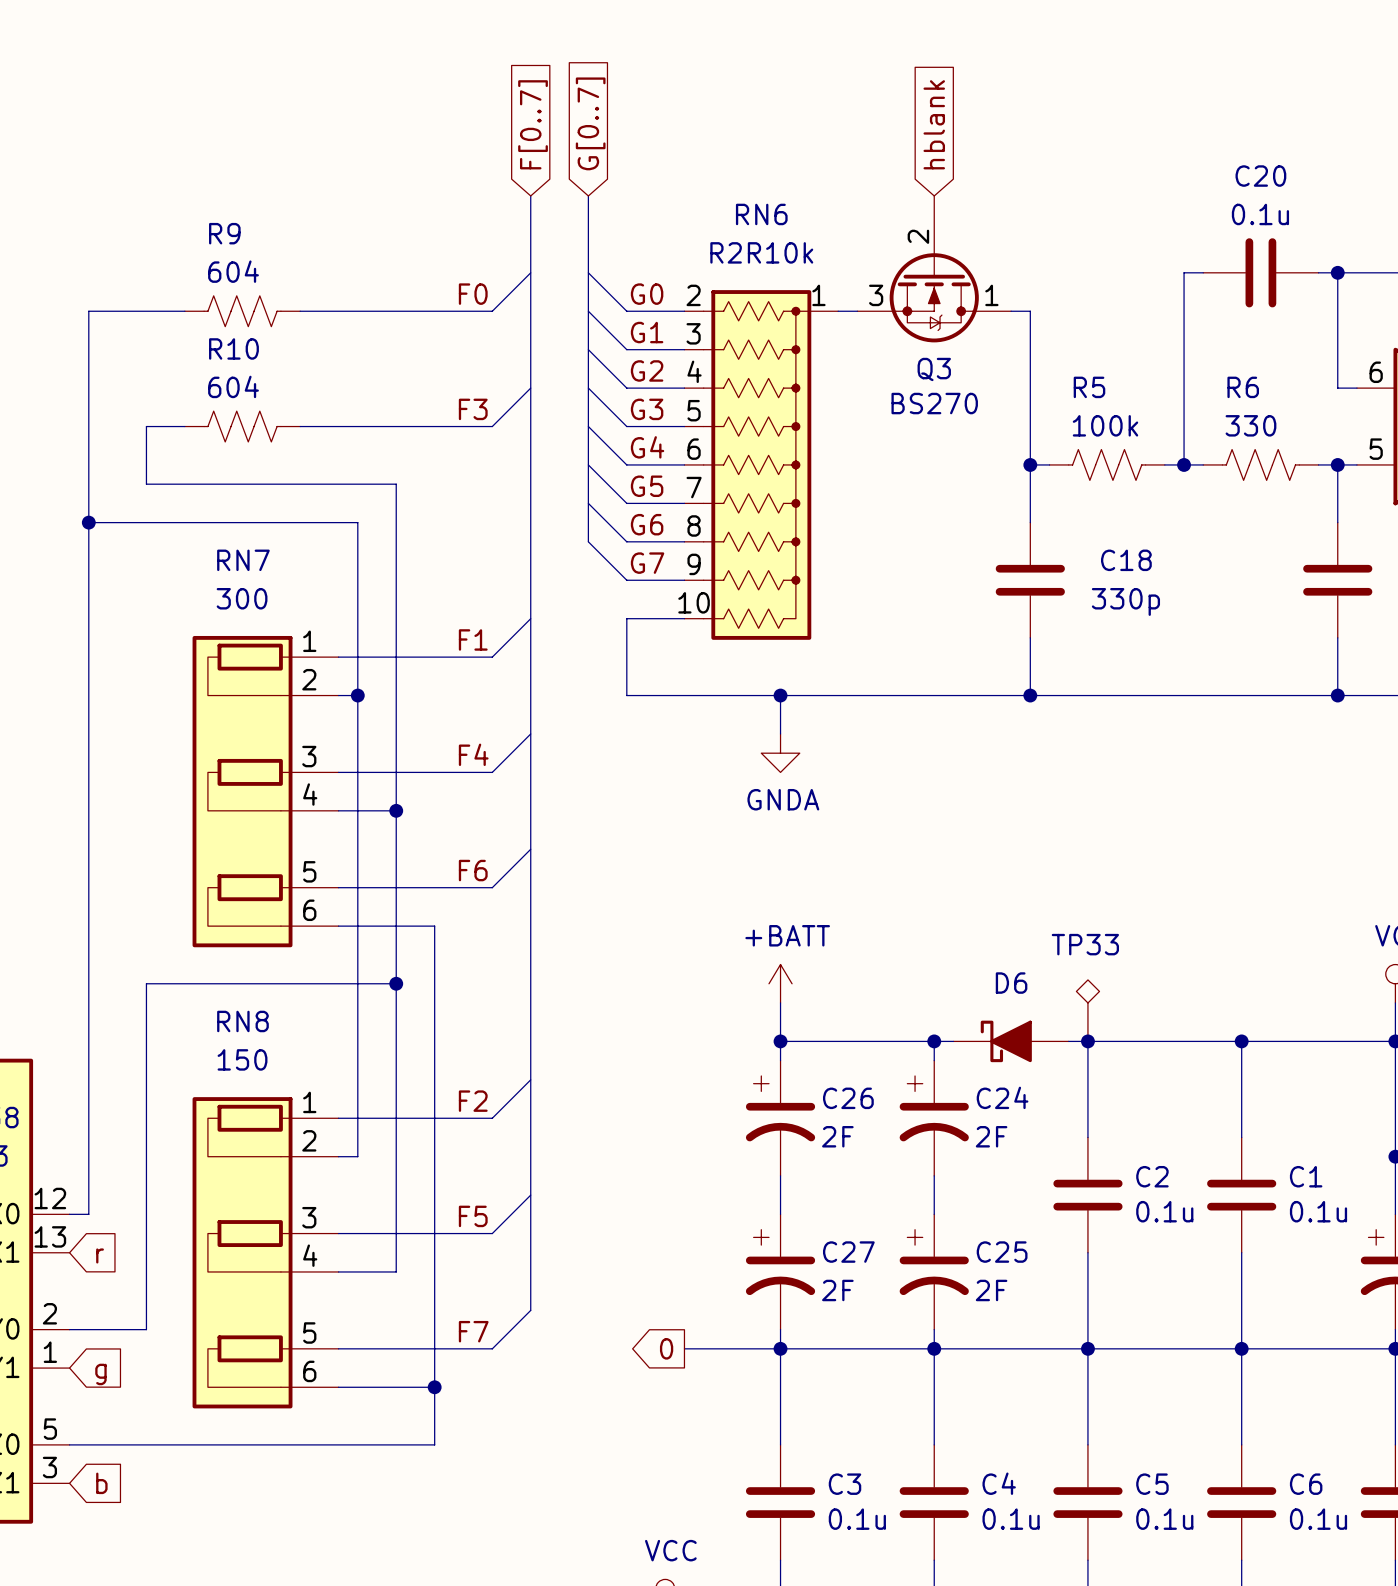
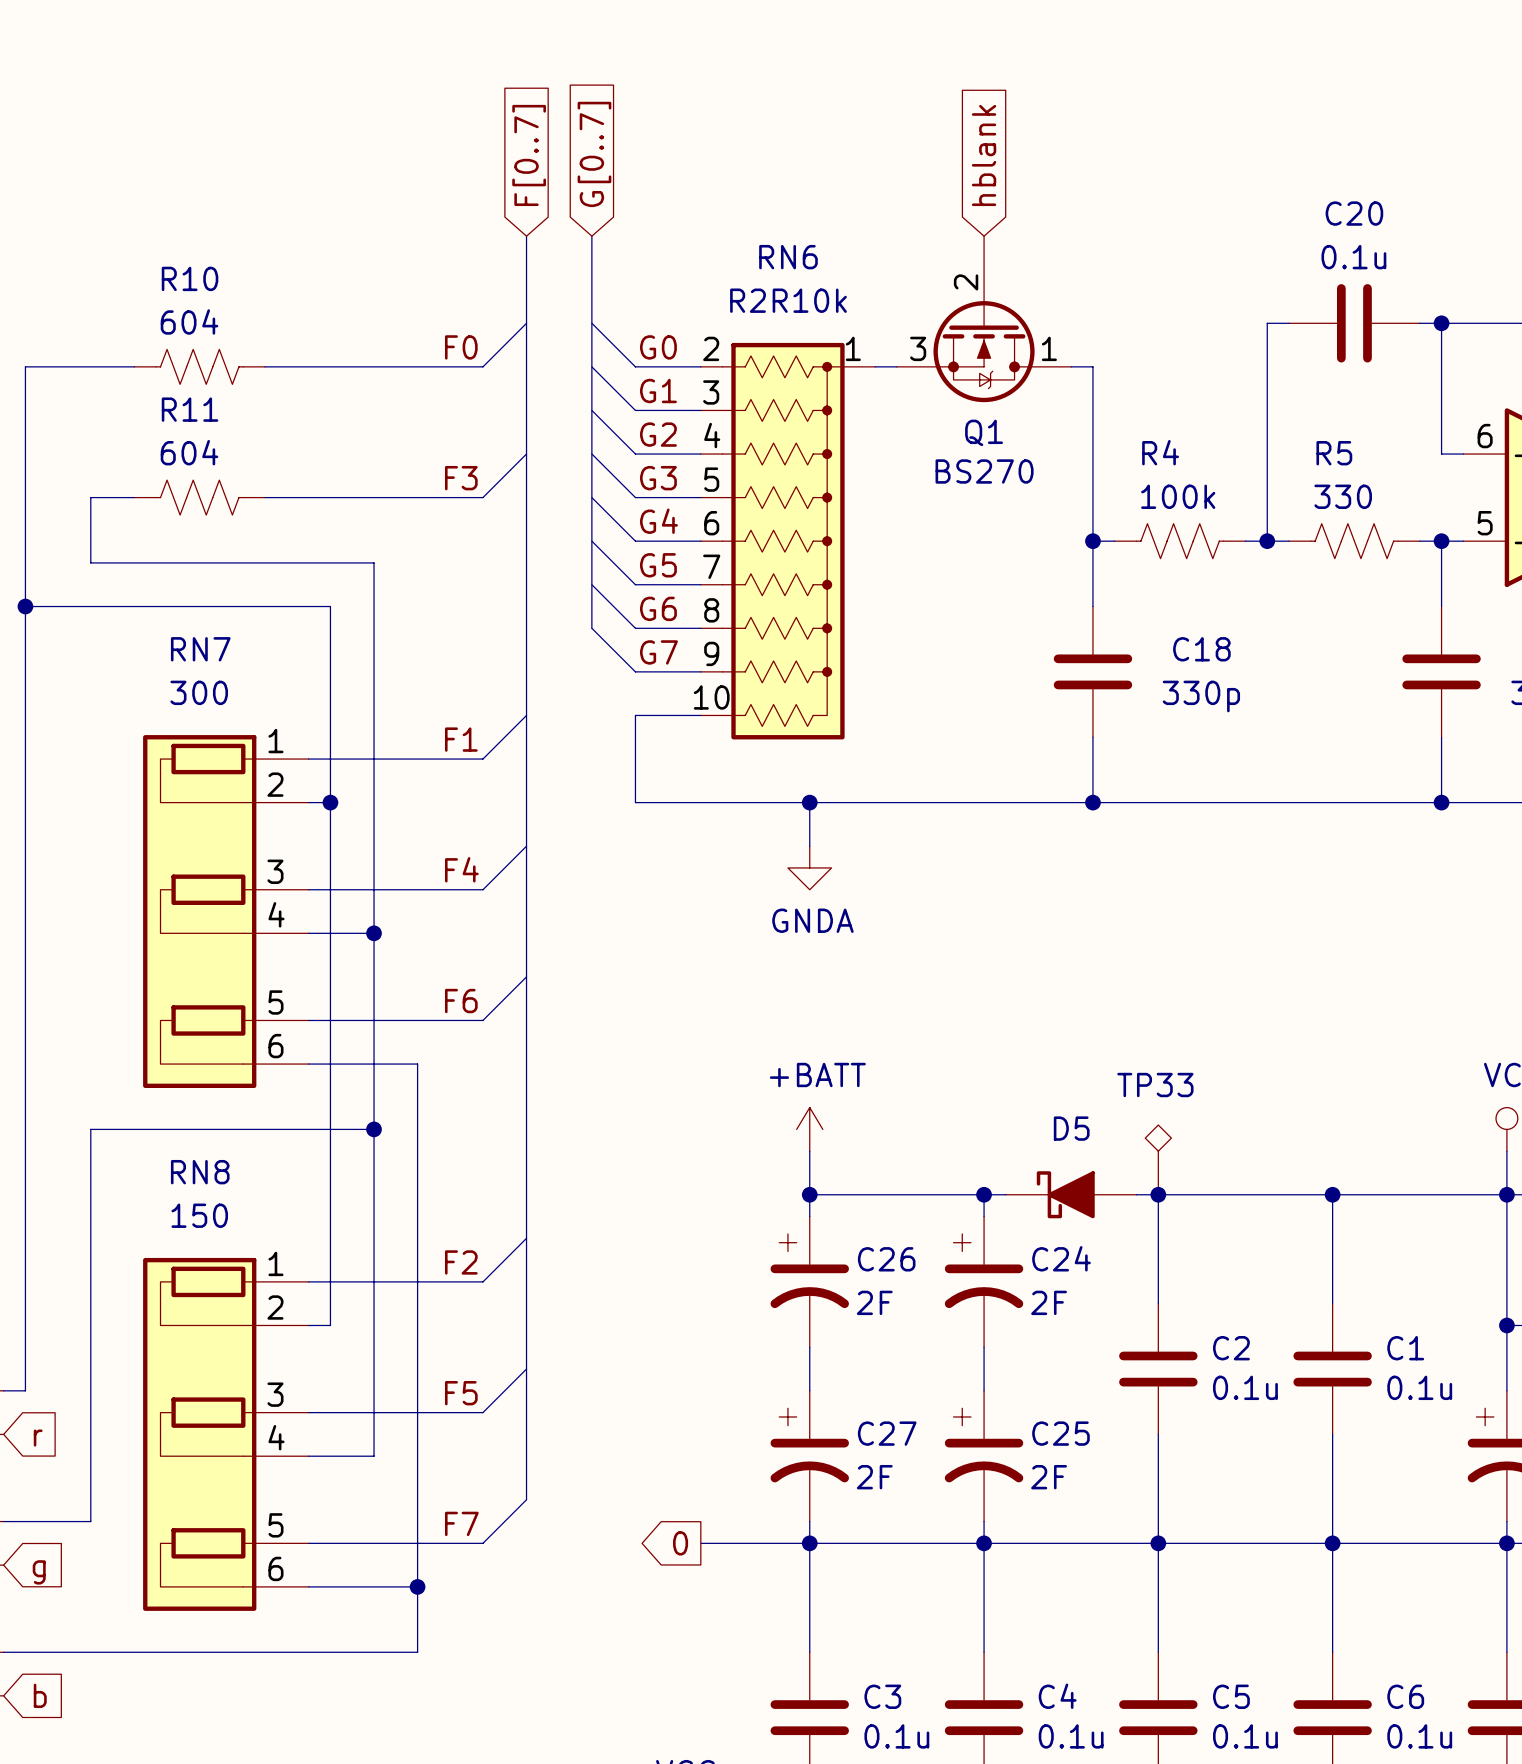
R9 name: R9 (224, 233) -> R10 (190, 278)
R10 name: R10 (233, 348) -> R11 (190, 409)
Q3 name: Q3 (934, 369) -> Q1 (984, 432)
R5 name: R5 (1089, 387) -> R4 (1160, 452)
R6 name: R6 (1243, 387) -> R5 (1334, 453)
D6 name: D6 (1011, 983) -> D5 (1071, 1128)

